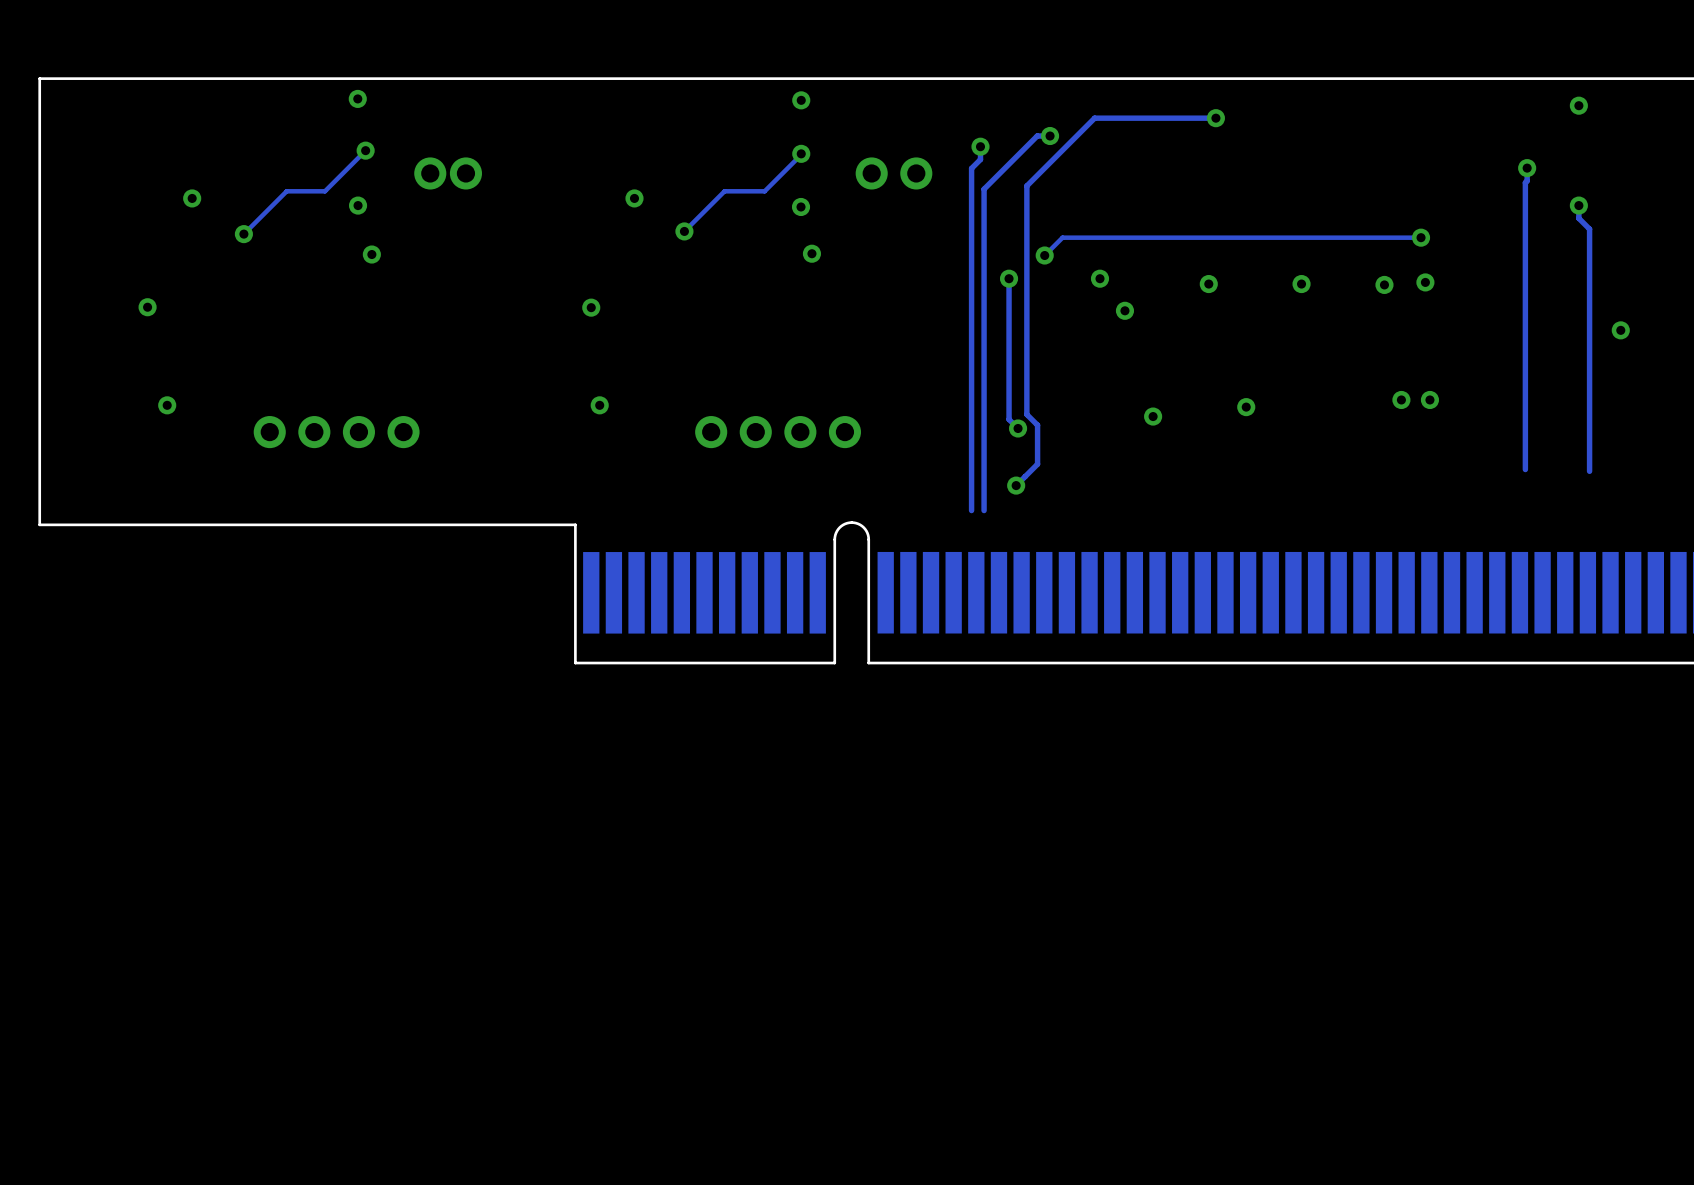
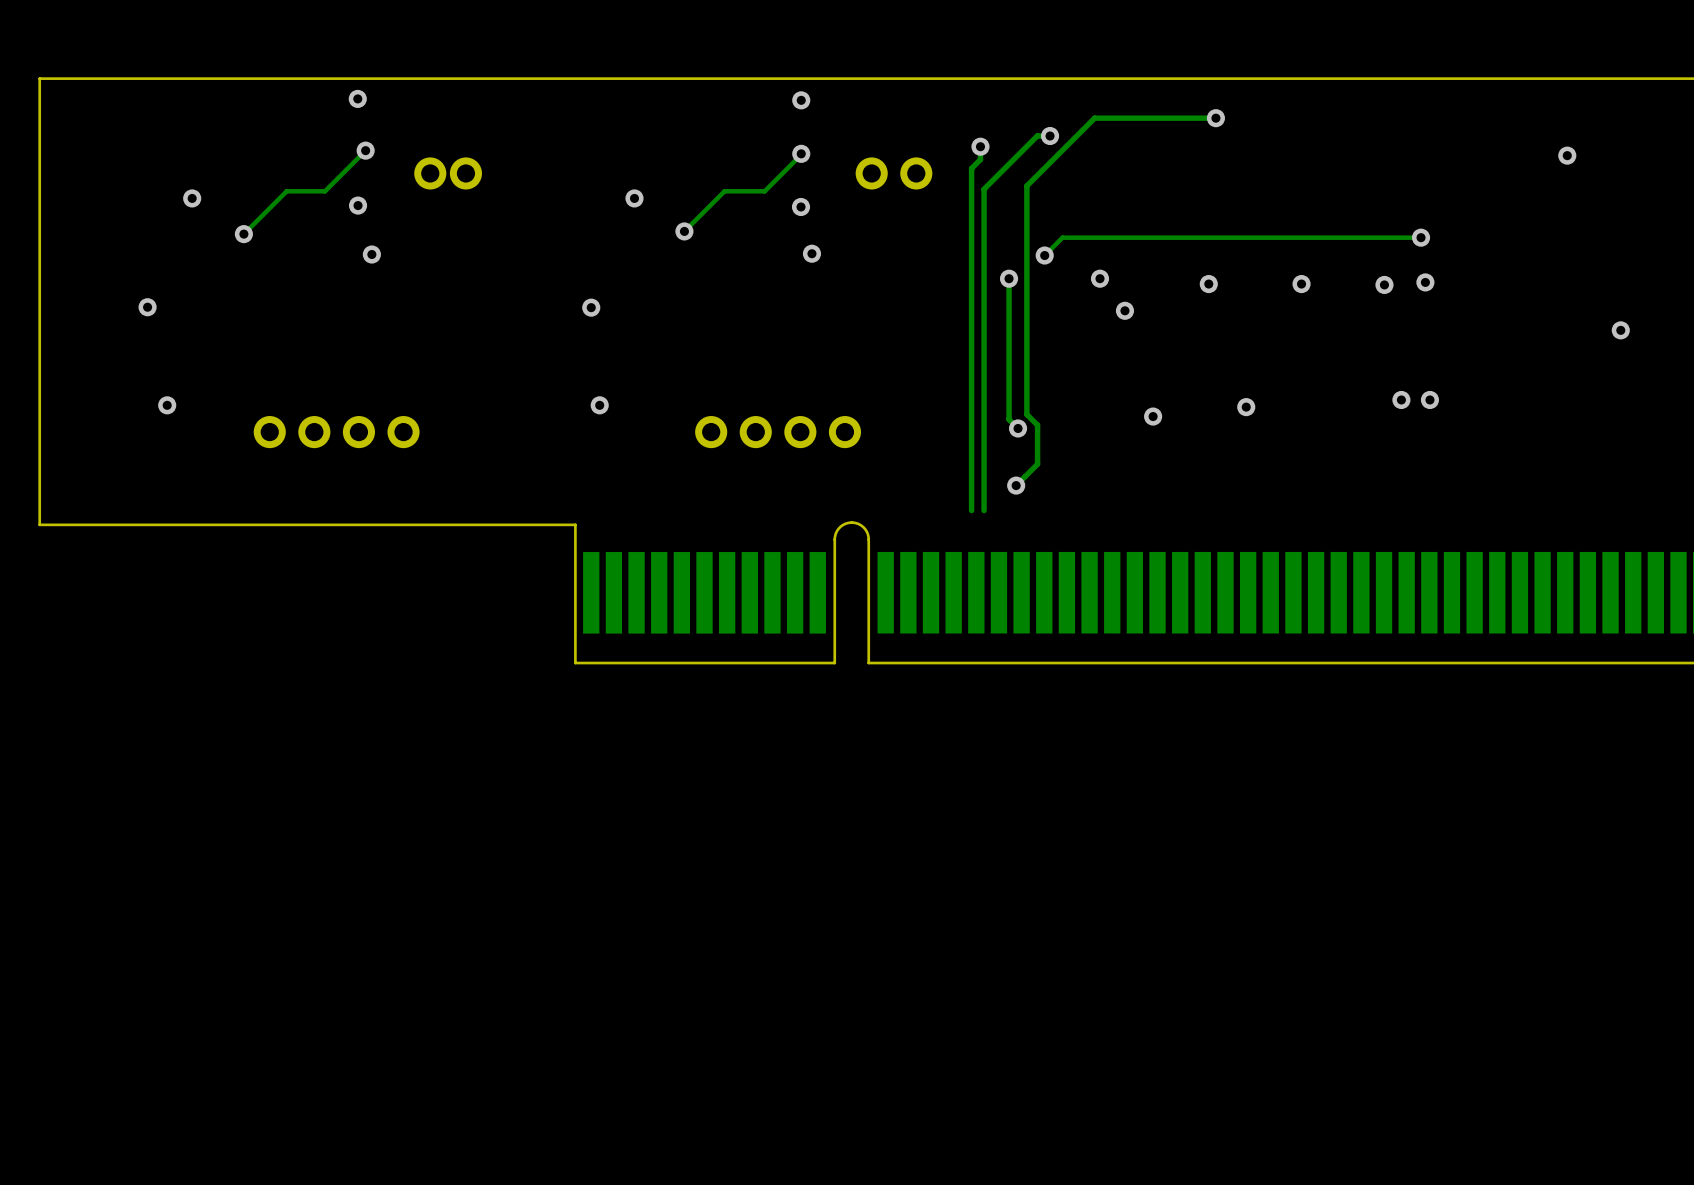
via: (1578, 105) -> none
via: none -> (1567, 155)
track: (1527, 168) (1527, 180) (1525, 182) (1525, 469) -> none
via: (1527, 168) -> none
track: (1578, 205) (1578, 218) (1589, 229) (1589, 471) -> none
via: (1578, 205) -> none

